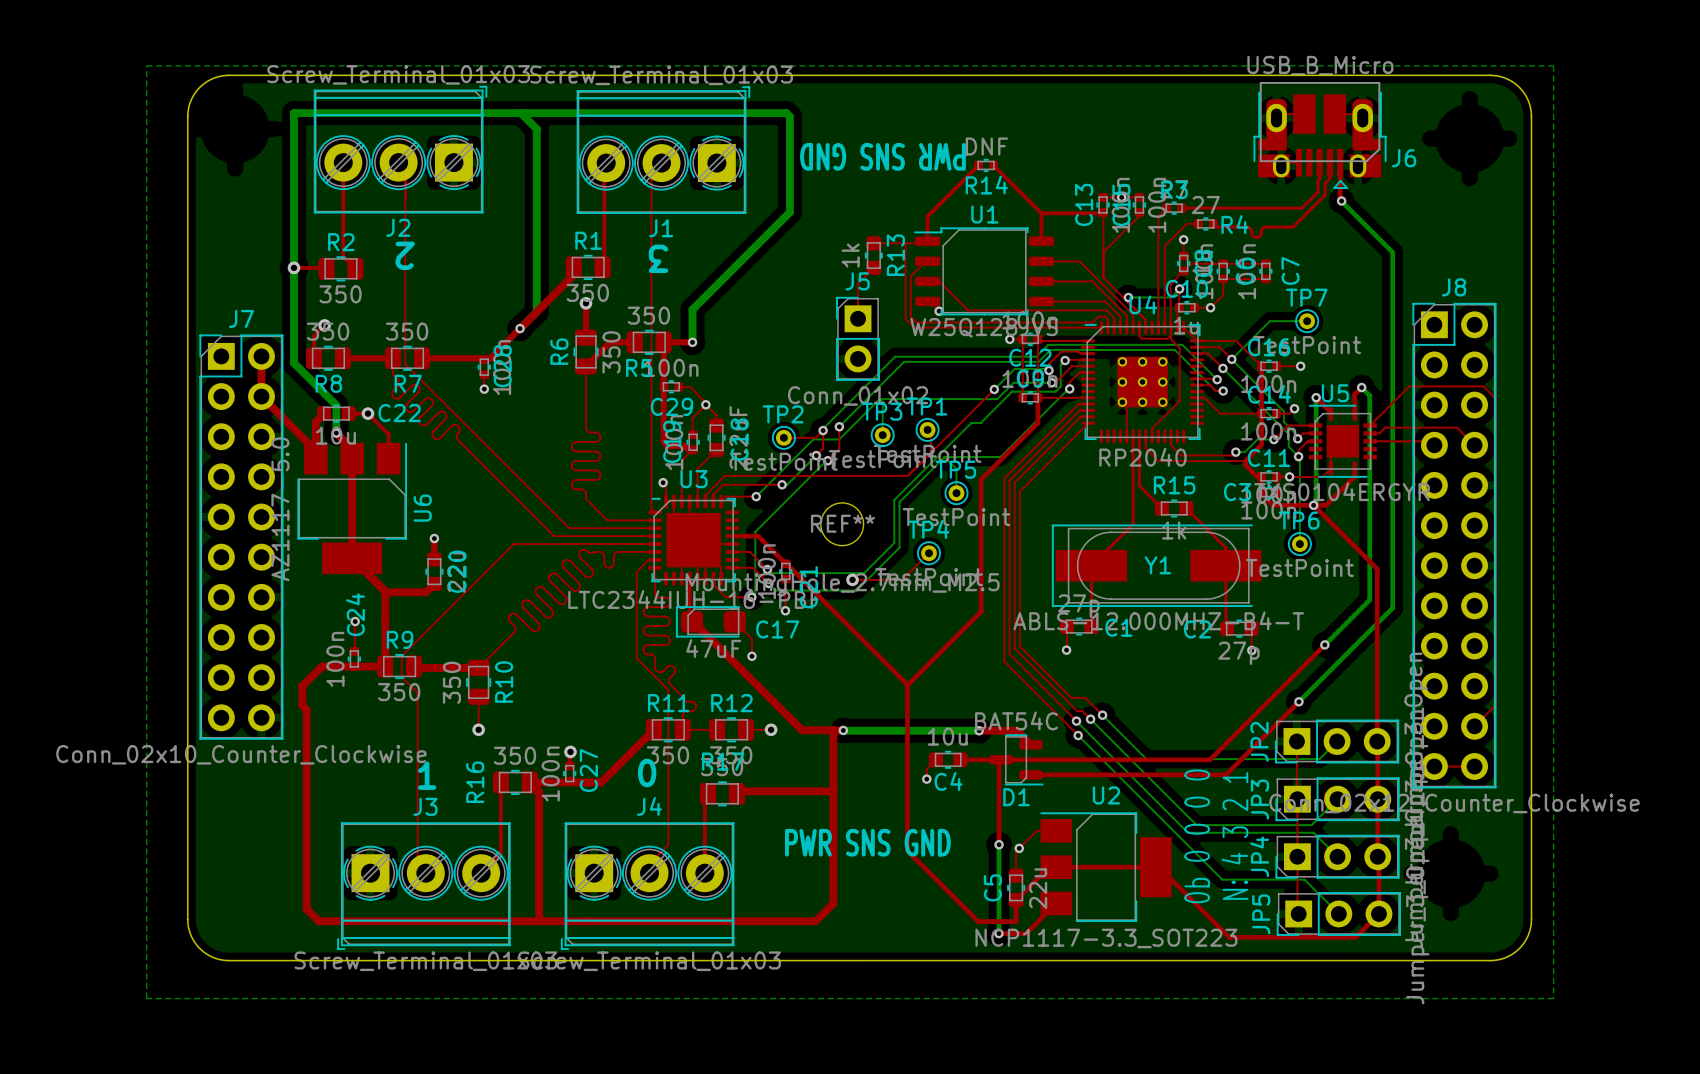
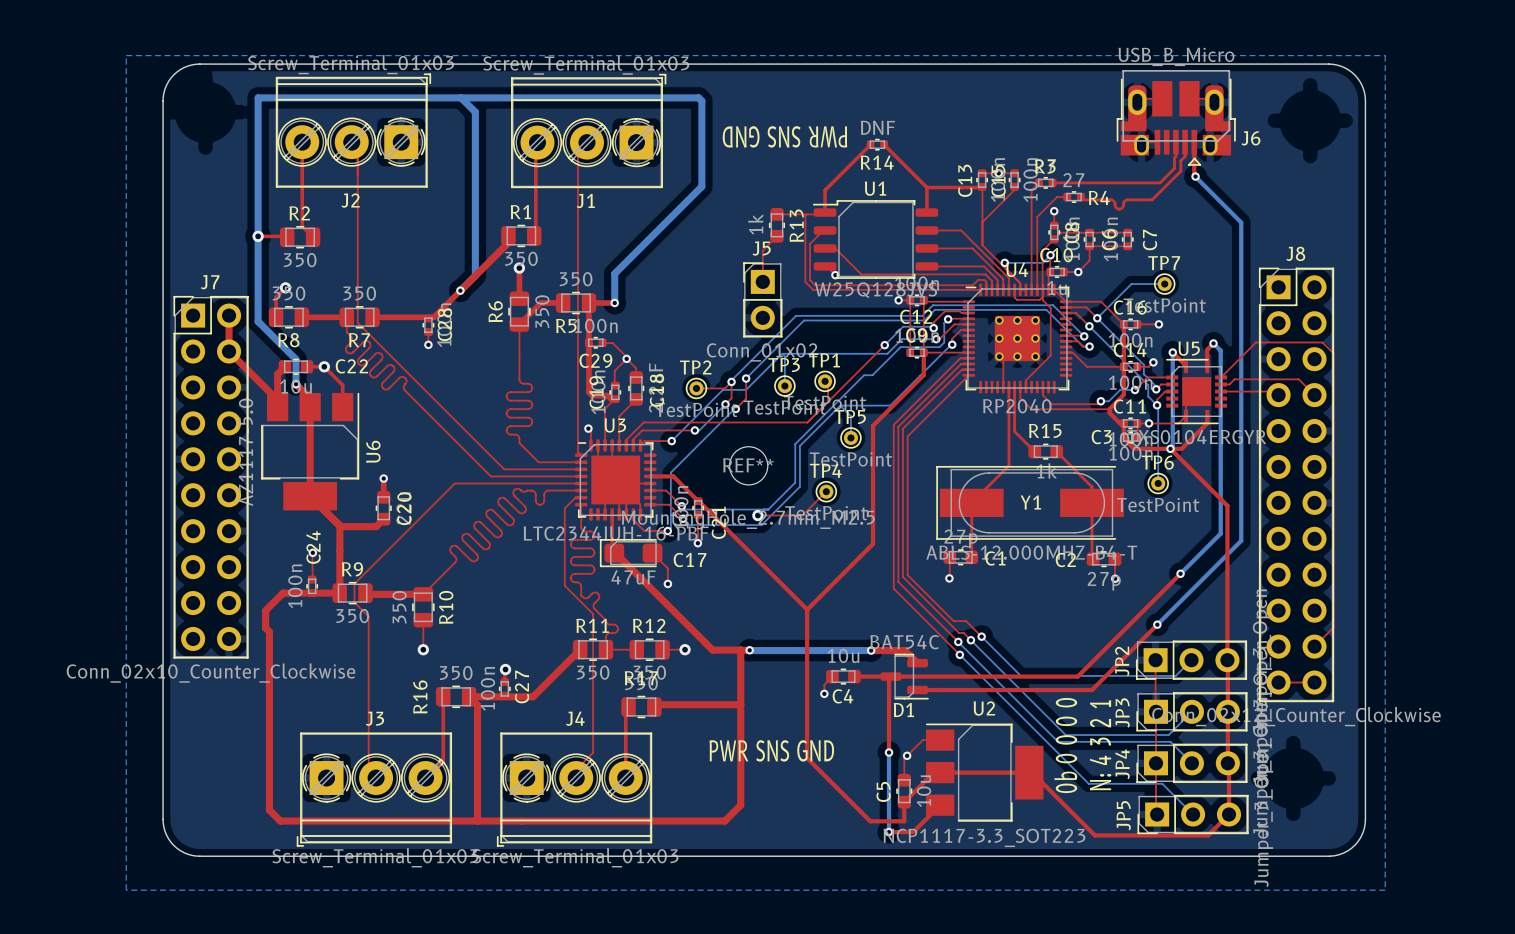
text: 2 (405, 255) -> none
text: 3 (658, 258) -> none
text: 0 (647, 773) -> none
text: 1 (427, 775) -> none
C5 value: 22u (1038, 888) -> 10u (924, 791)

